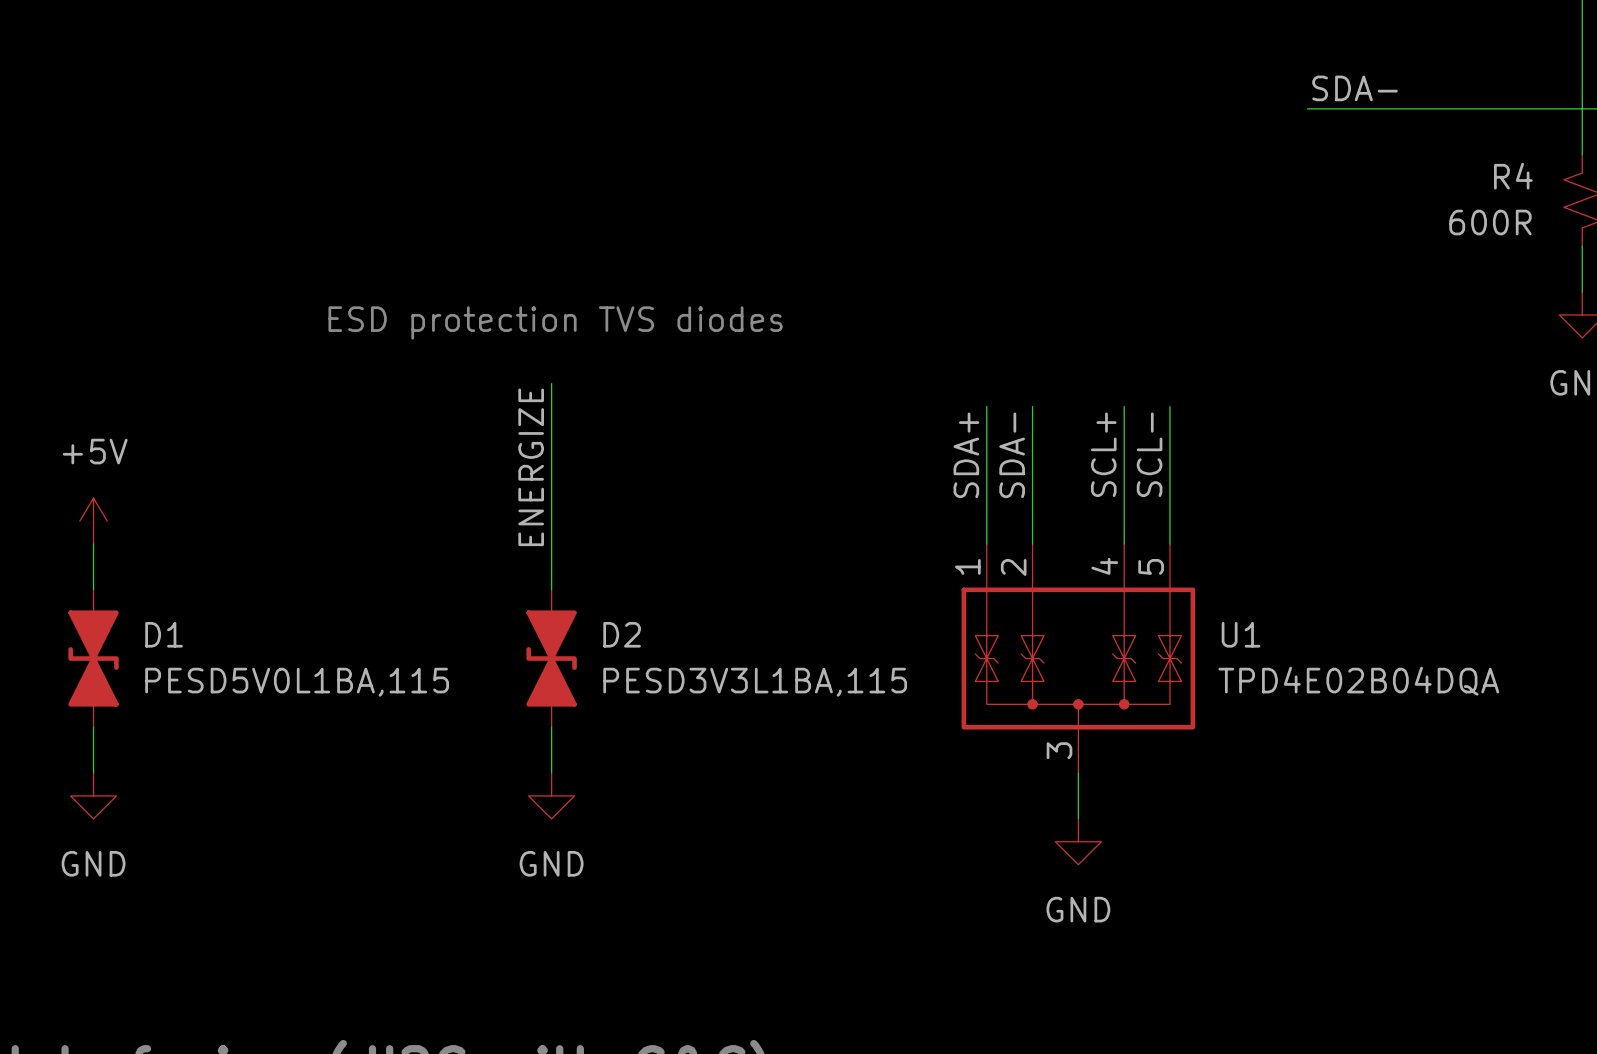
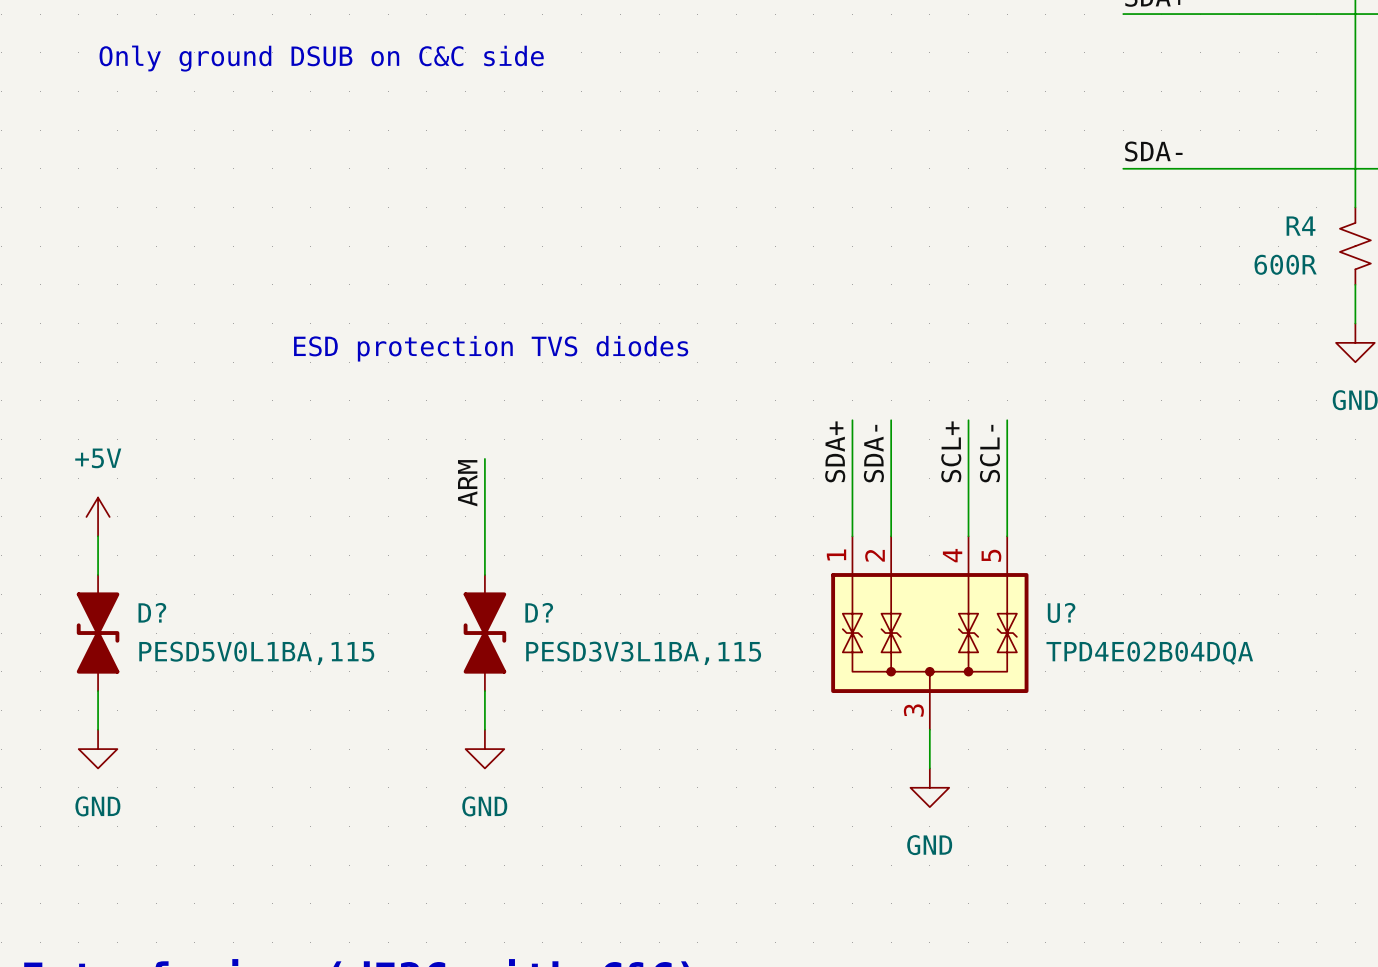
wire: (551, 383) (551, 452) -> none
label: ENERGIZE (531, 467) -> none
label: none -> ARM (467, 483)
D1 name: D1 (164, 634) -> D? (152, 612)
D2 name: D2 (622, 634) -> D? (539, 612)
U1 name: U1 (1241, 634) -> U? (1061, 612)

